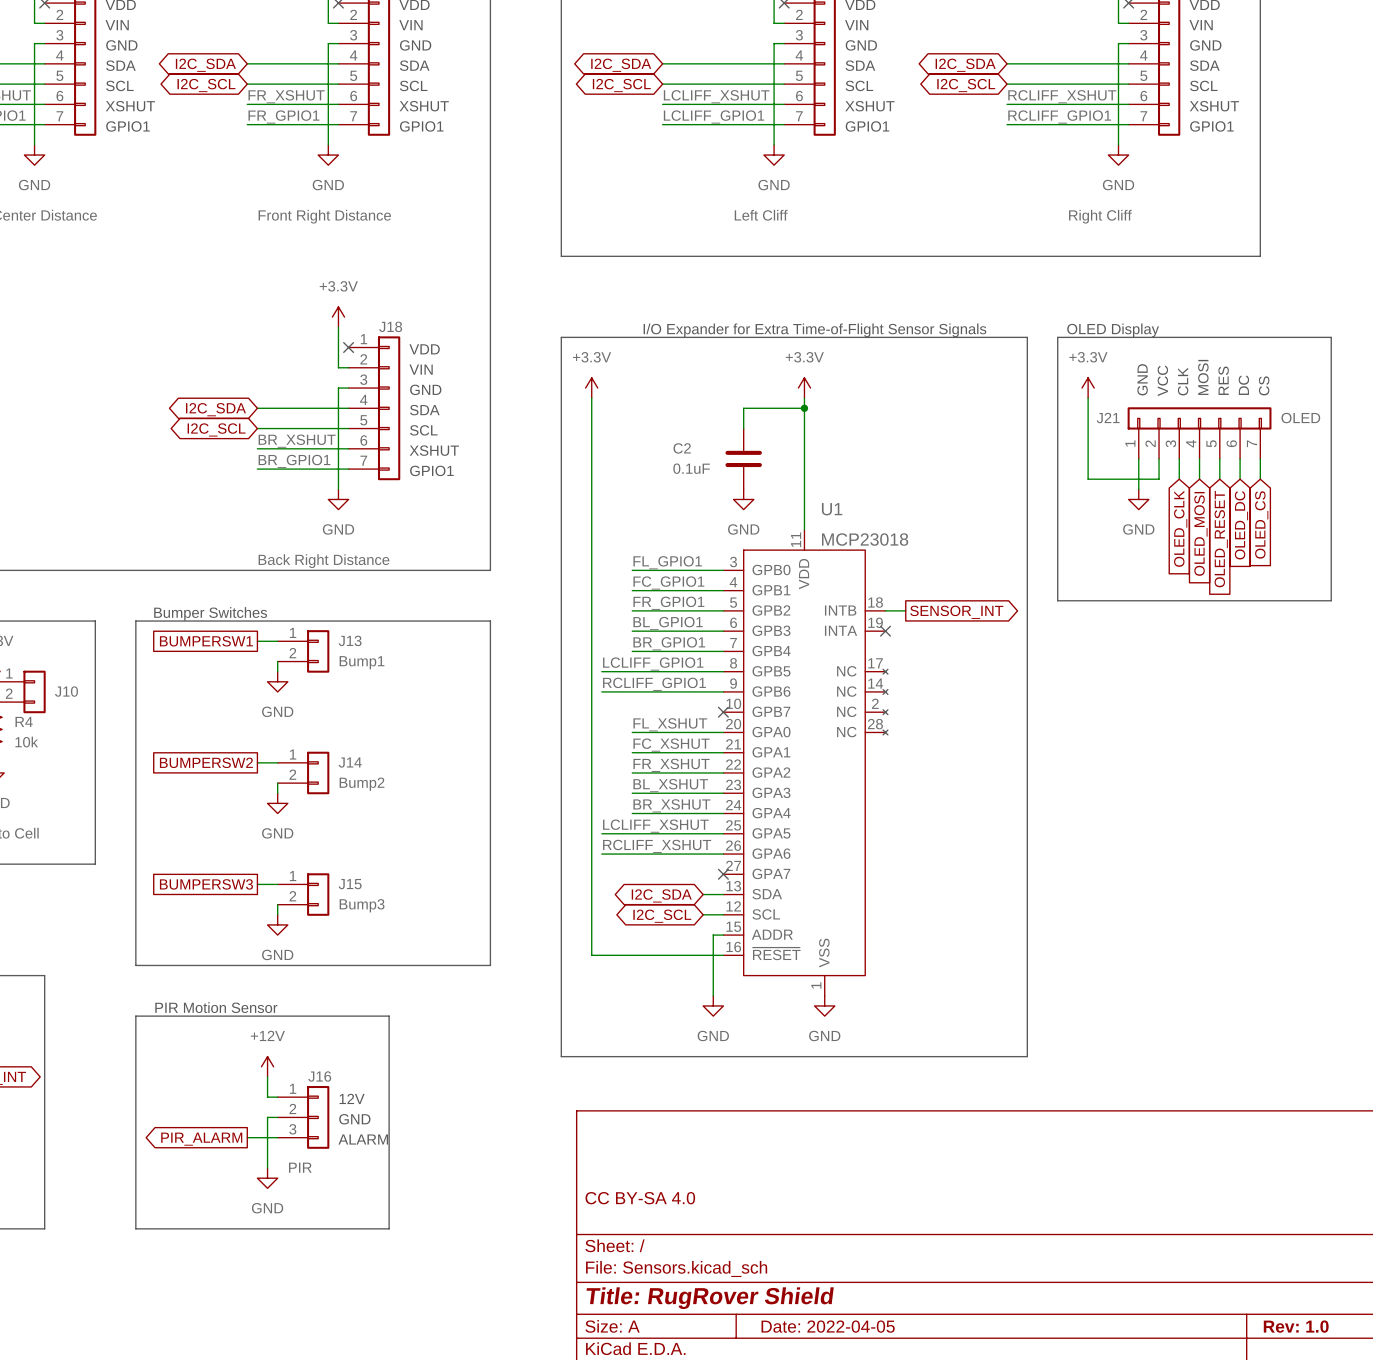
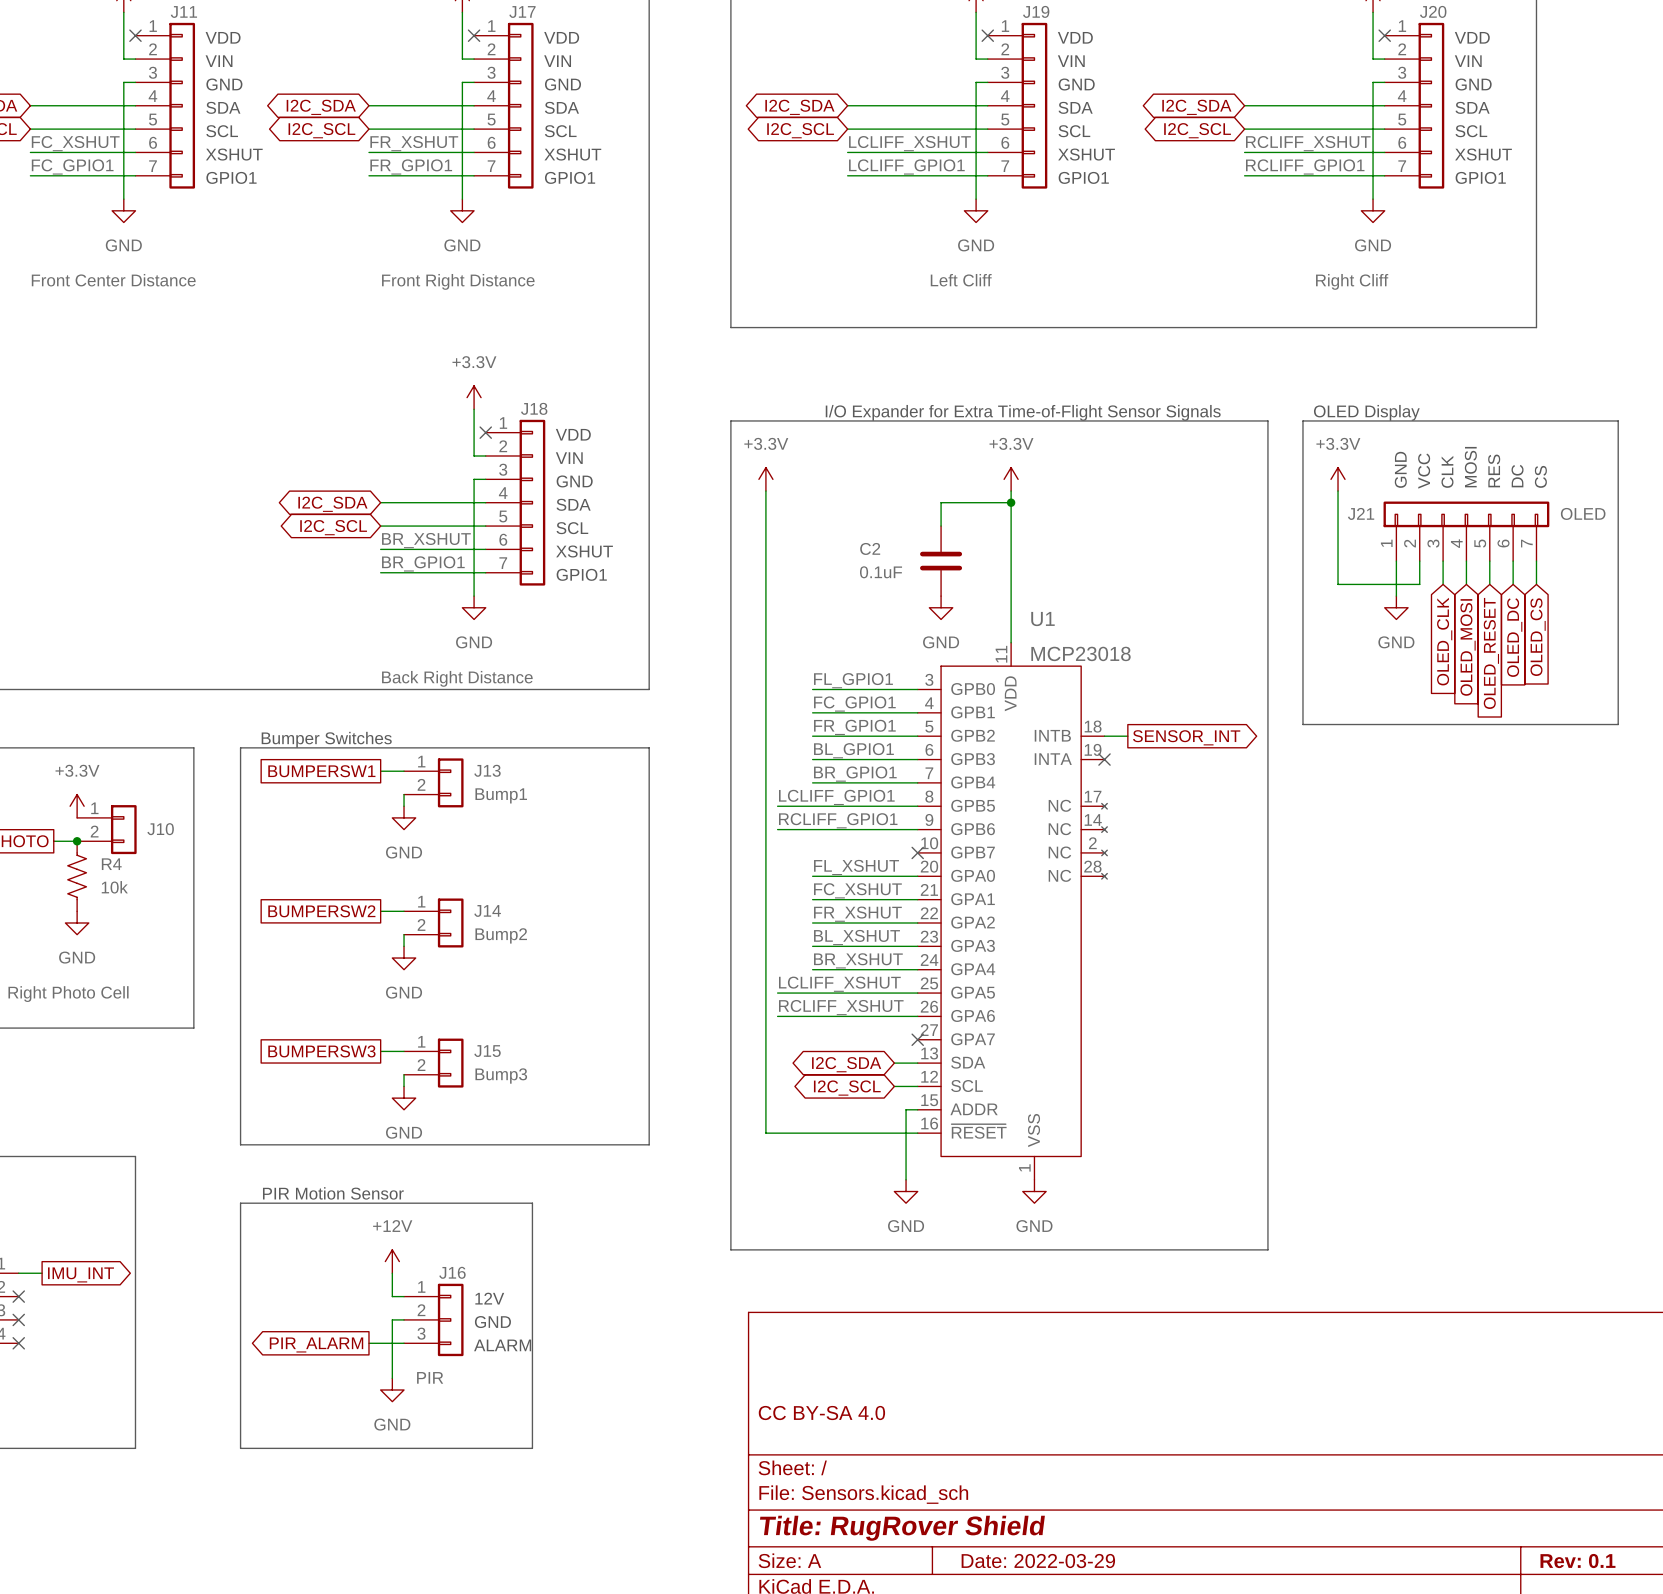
title block: Date: 2022-04-05 (828, 1326) -> Date: 2022-03-29 (1038, 1561)
title block: Rev: 1.0 (1296, 1326) -> Rev: 0.1 (1577, 1561)

